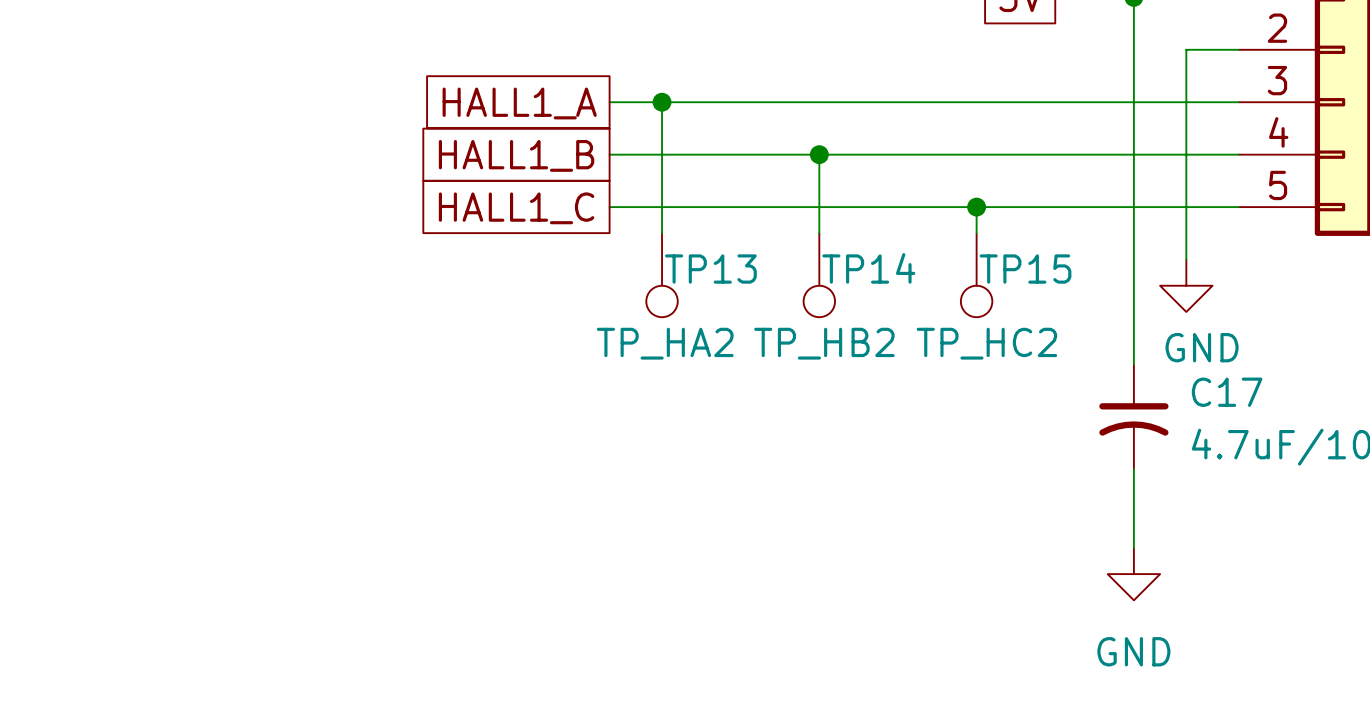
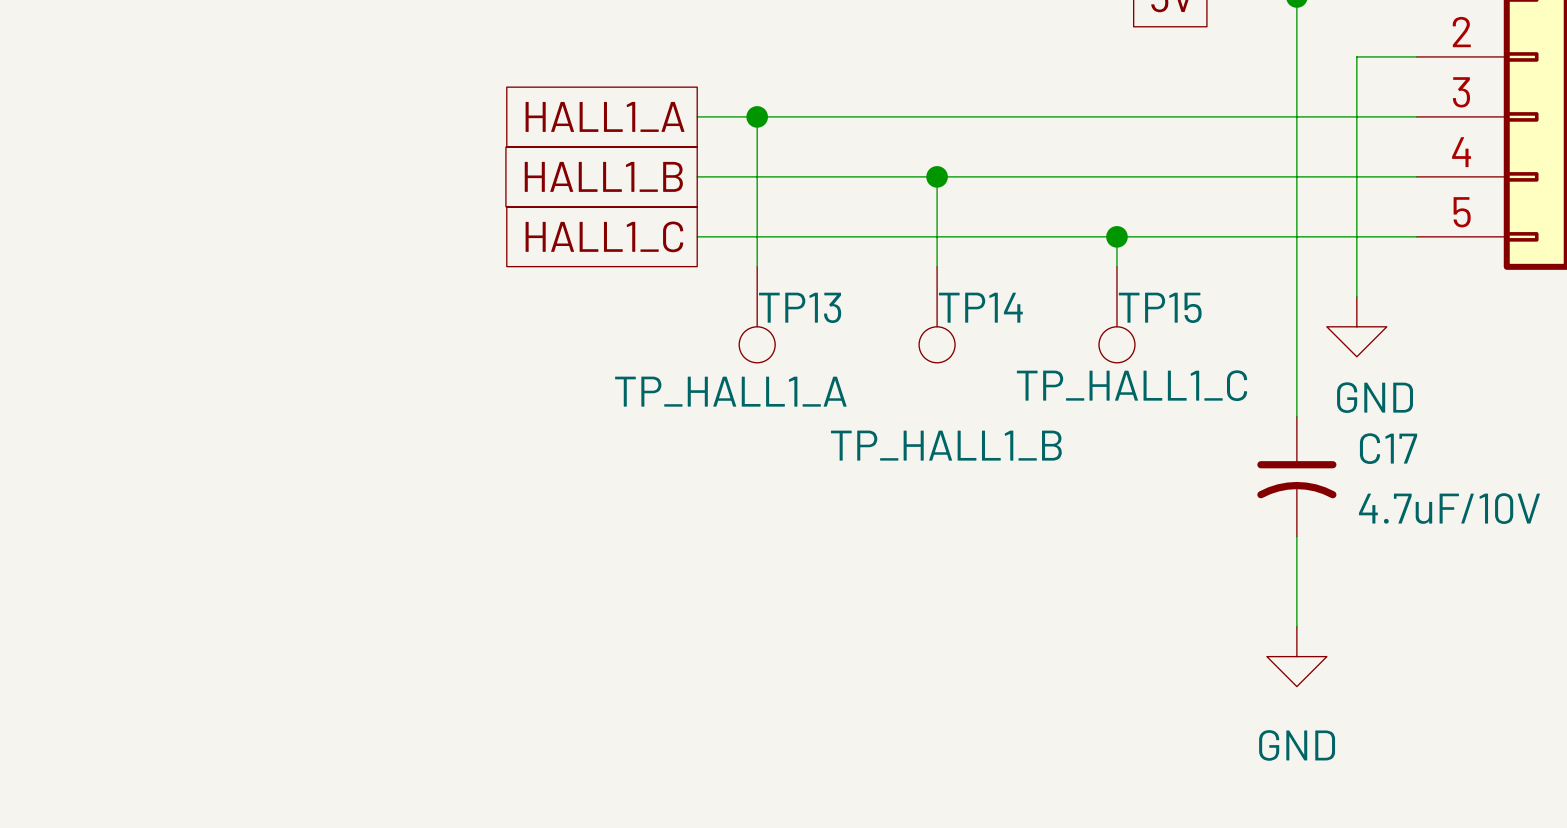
TP13 value: TP_HA2 (665, 343) -> TP_HALL1_A (730, 391)
TP14 value: TP_HB2 (824, 343) -> TP_HALL1_B (946, 445)
TP15 value: TP_HC2 (986, 343) -> TP_HALL1_C (1131, 385)

